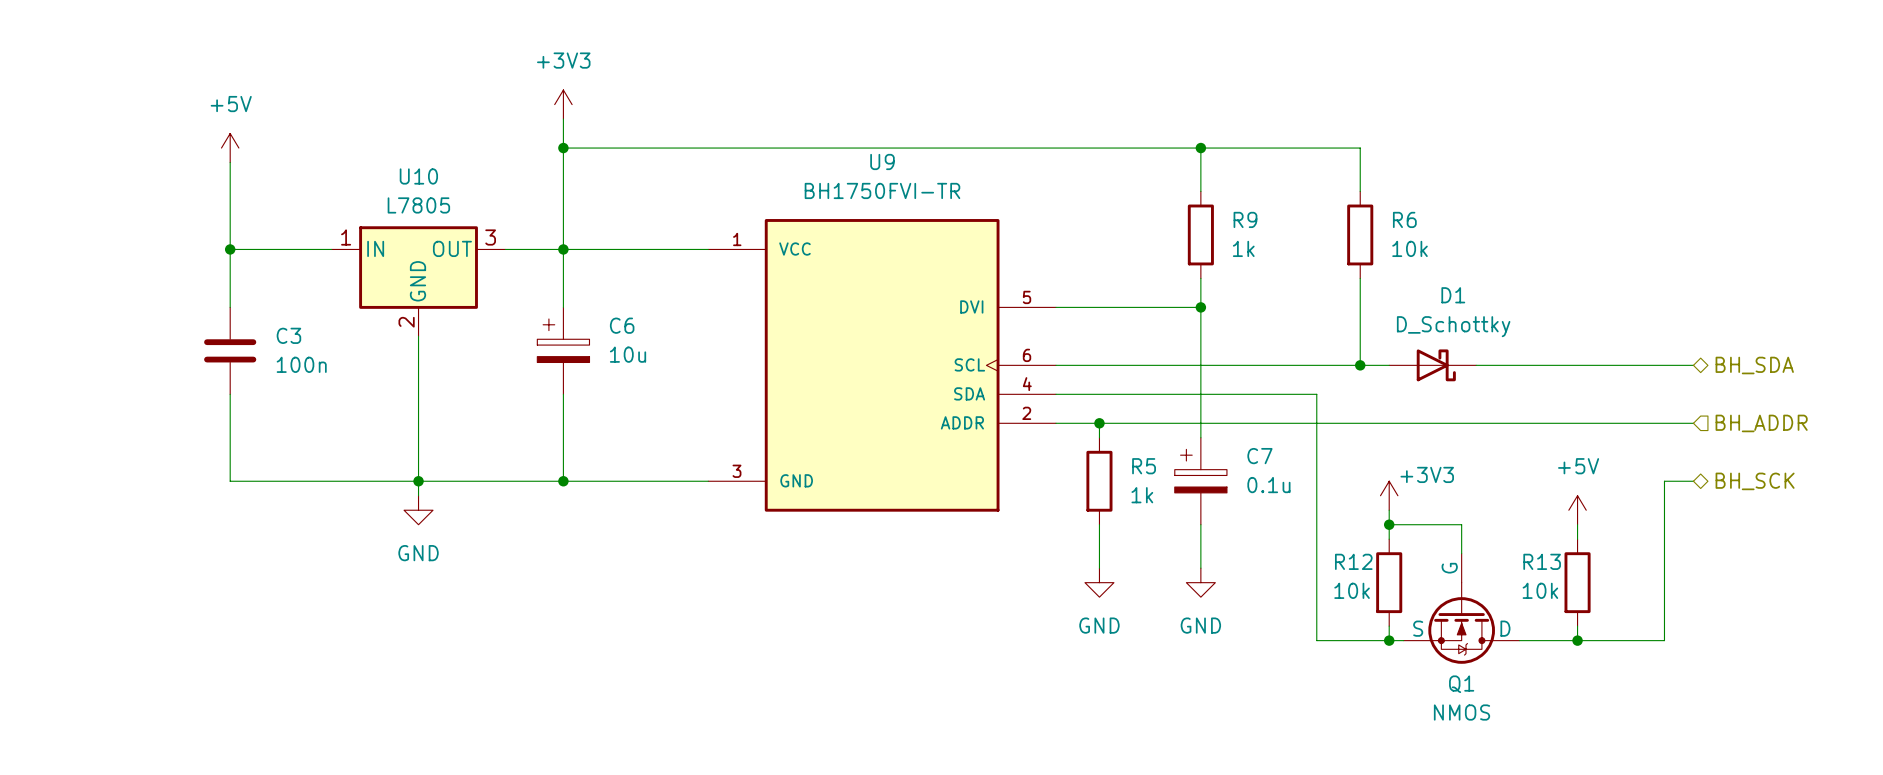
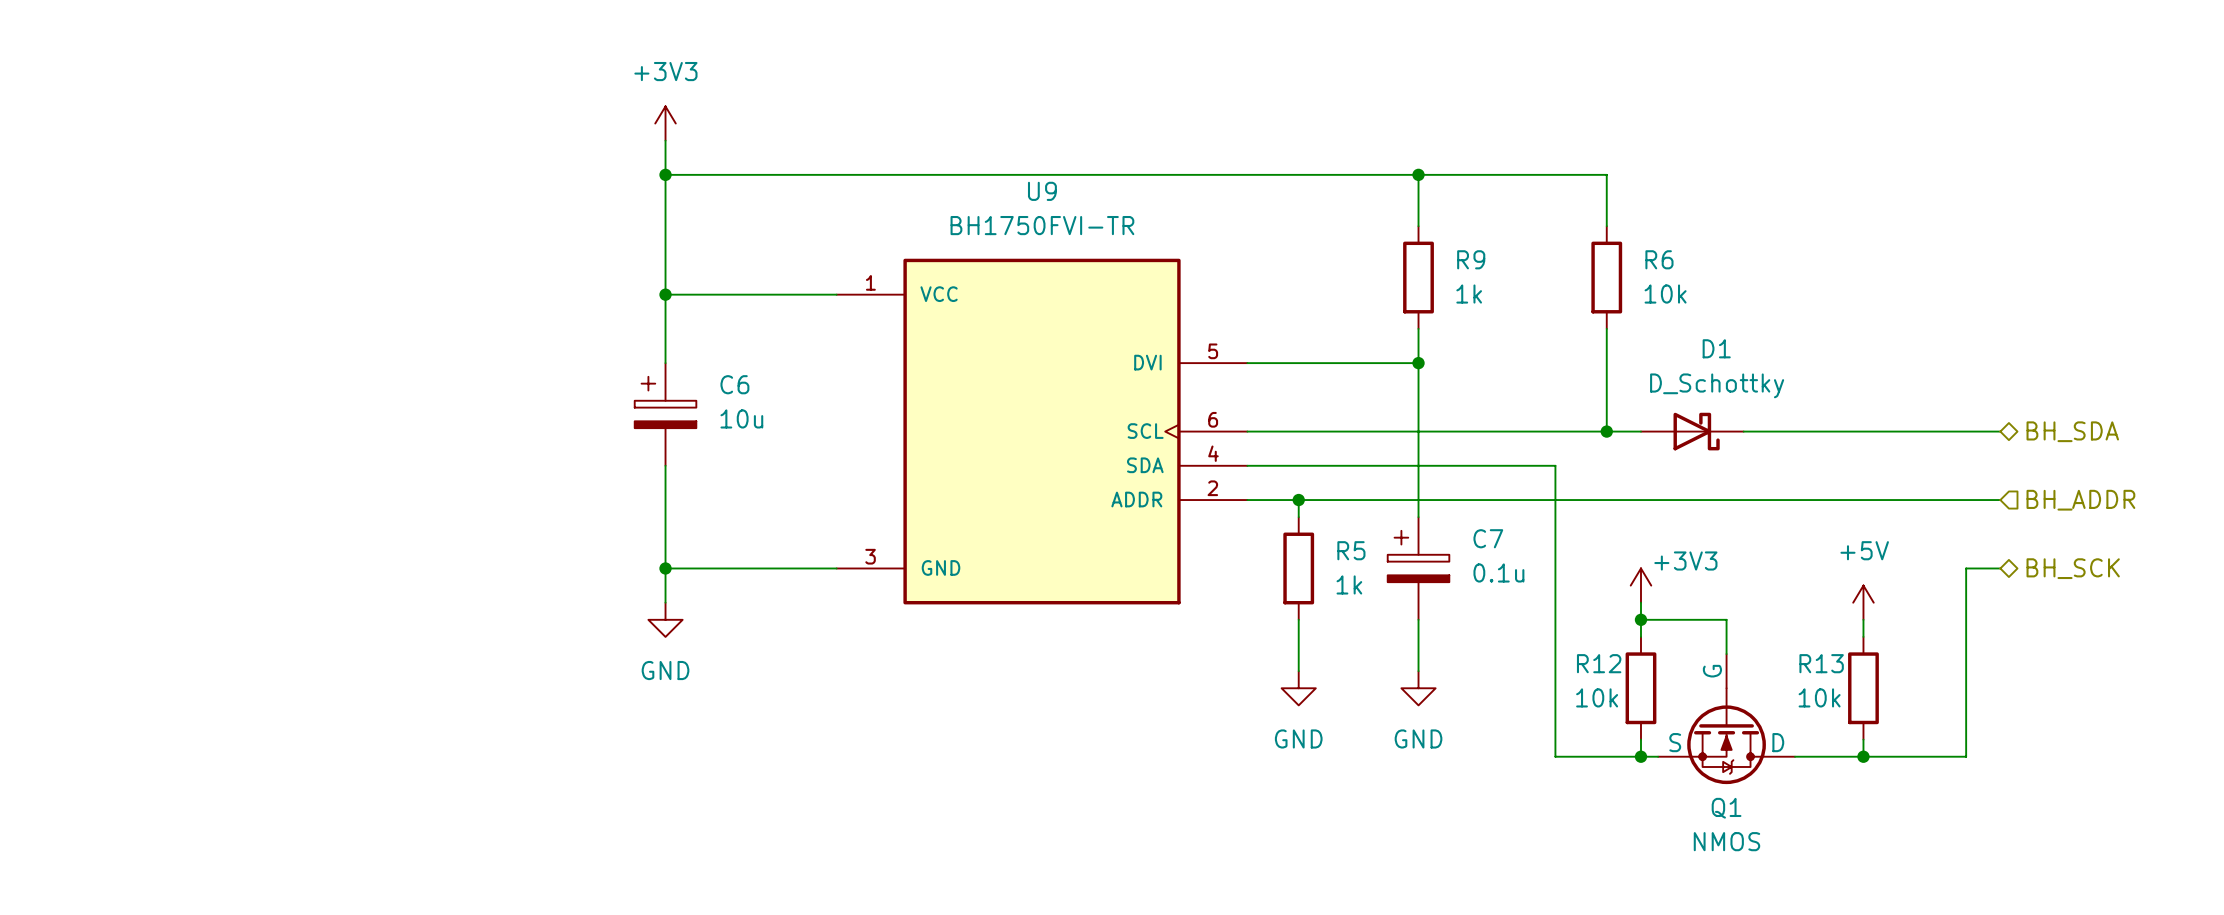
power symbol: +5V (230, 148) -> none
wire: (230, 162) (230, 307) -> none
wire: (230, 249) (331, 249) -> none
junction: (230, 249) -> none
wire: (505, 249) (563, 249) -> none
U10: L7805 (418, 281) -> none
wire: (418, 336) (418, 495) -> none
C3: 100n (230, 350) -> none
wire: (230, 394) (230, 481) (563, 481) -> (665, 602) (665, 568)
junction: (418, 481) -> none
power symbol position: GND (418, 510) -> GND (665, 619)

